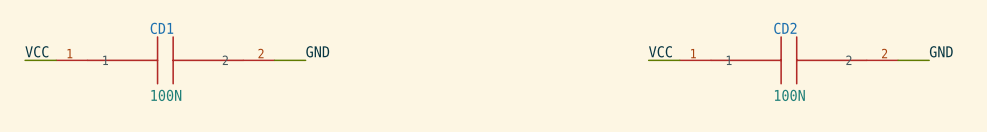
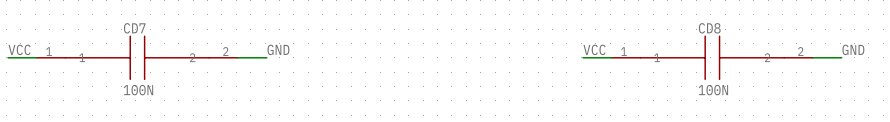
CD1 name: CD1 (161, 28) -> CD7 (134, 28)
CD2 name: CD2 (785, 28) -> CD8 (709, 28)

